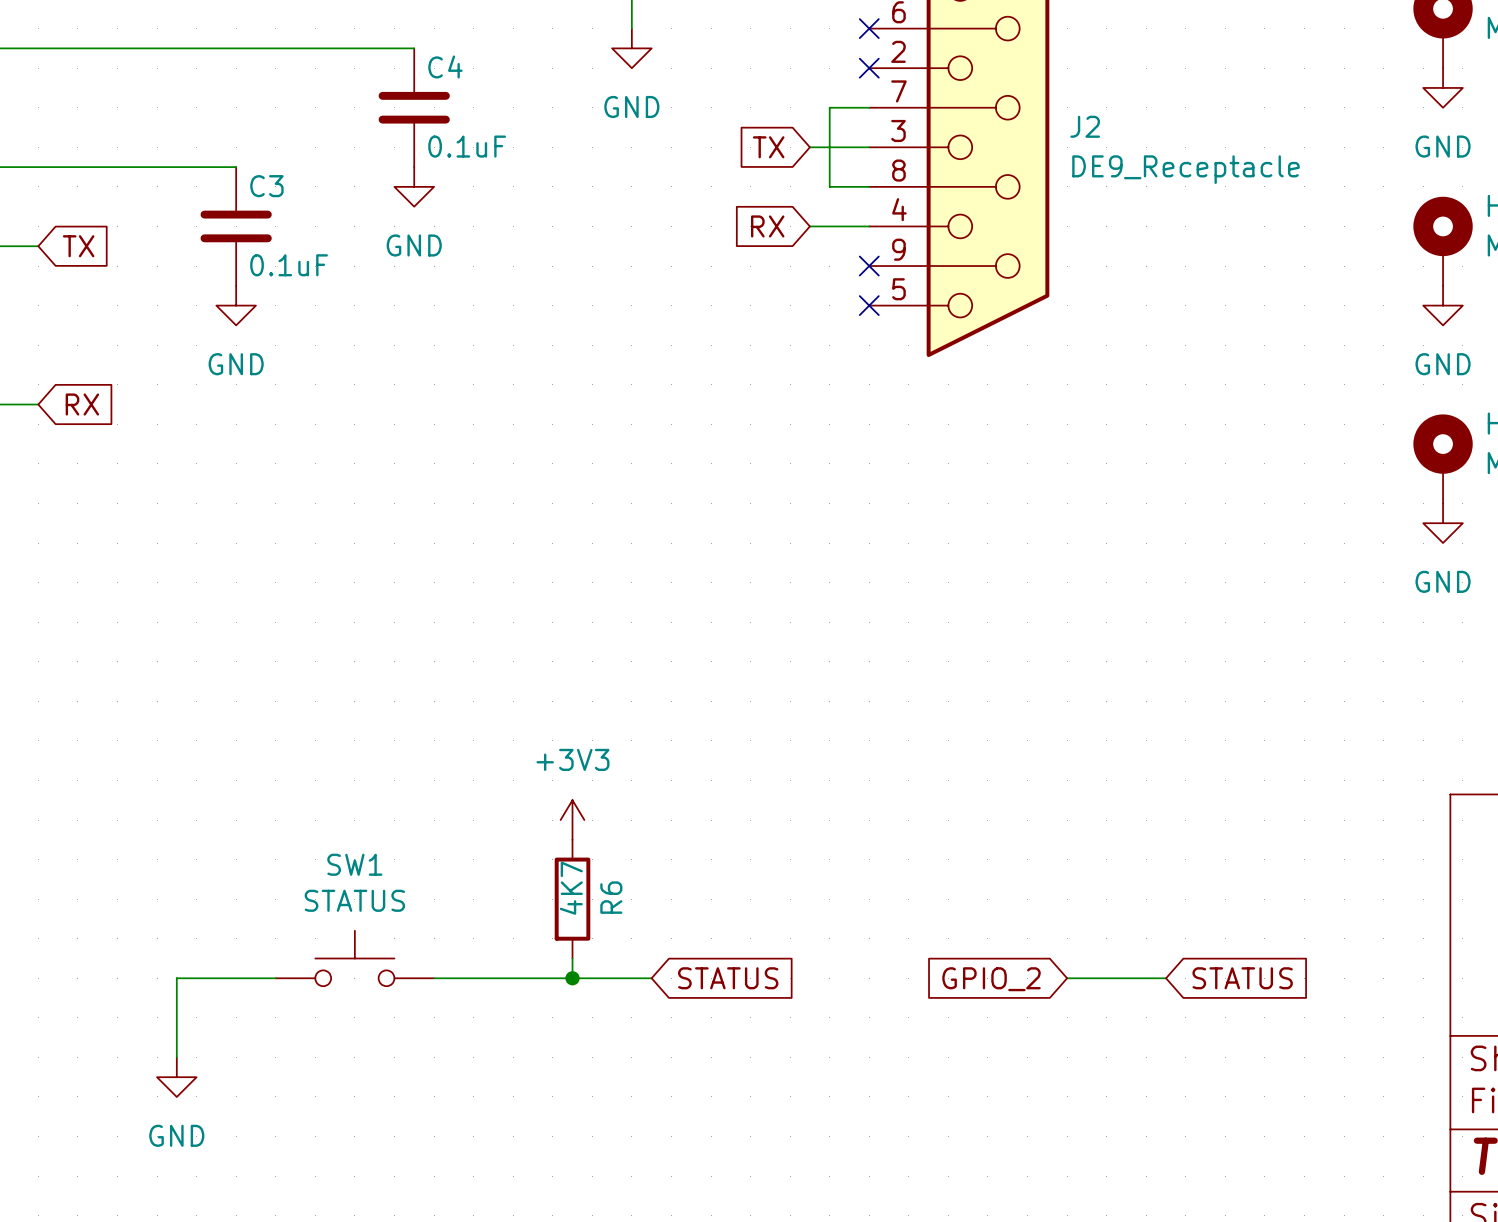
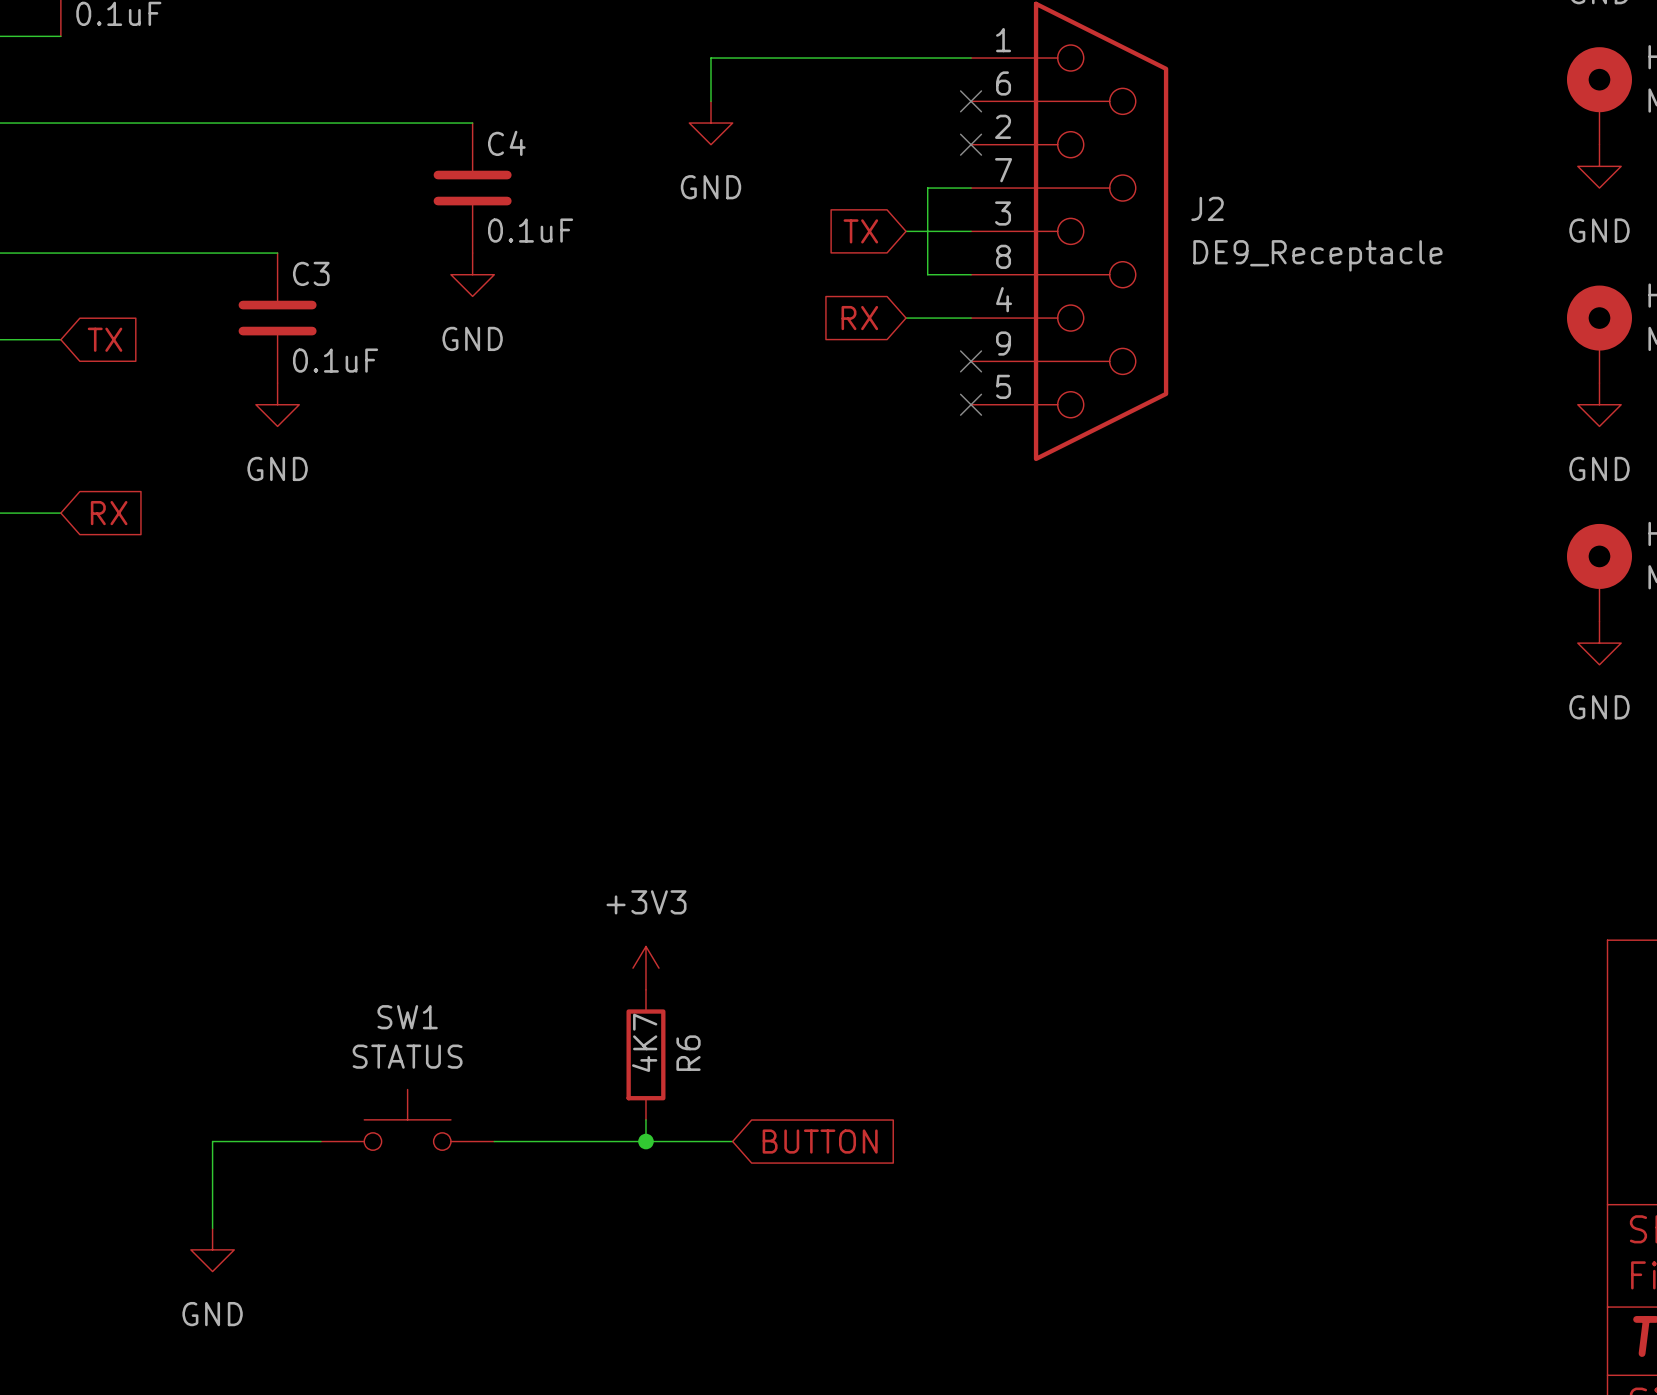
global label: STATUS (728, 978) -> BUTTON (820, 1141)
wire: (1067, 978) (1166, 978) -> none
global label: STATUS (1242, 978) -> none
global label: GPIO_2 (991, 979) -> none

